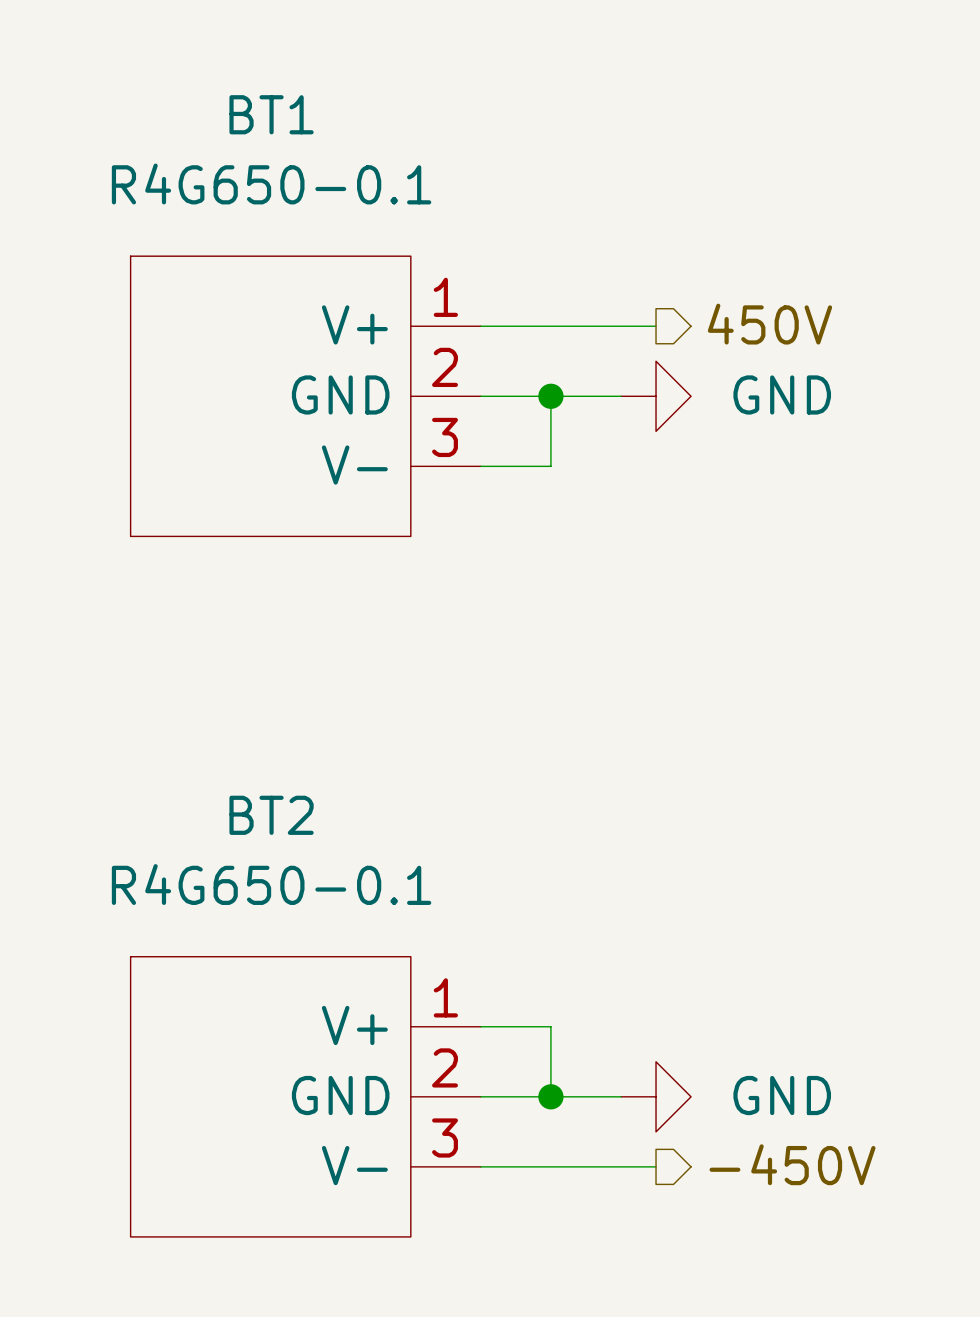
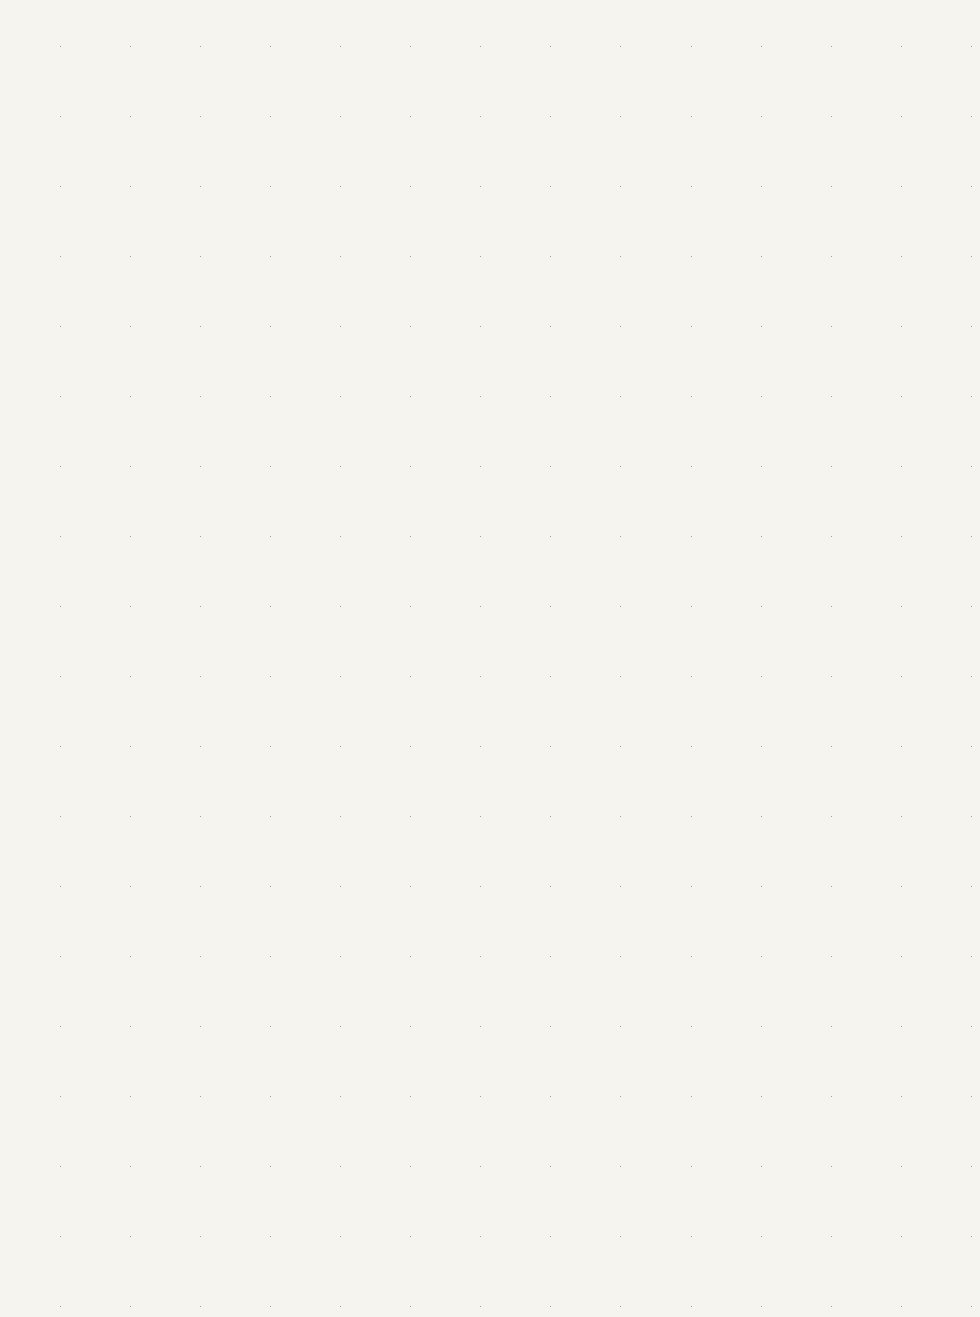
hierarchical label: 450V (769, 324) -> none
wire: (480, 326) (656, 326) -> none
BT1: R4G650-0.1 (305, 396) -> none
wire: (480, 396) (620, 396) -> none
wire: (550, 396) (550, 466) (480, 466) -> none
junction: (550, 396) -> none
power symbol: GND (656, 396) -> none
wire: (480, 1026) (550, 1026) (550, 1096) -> none
BT2: R4G650-0.1 (305, 1096) -> none
wire: (480, 1096) (620, 1096) -> none
junction: (550, 1096) -> none
power symbol: GND (656, 1096) -> none
hierarchical label: -450V (792, 1164) -> none
wire: (480, 1166) (656, 1166) -> none

